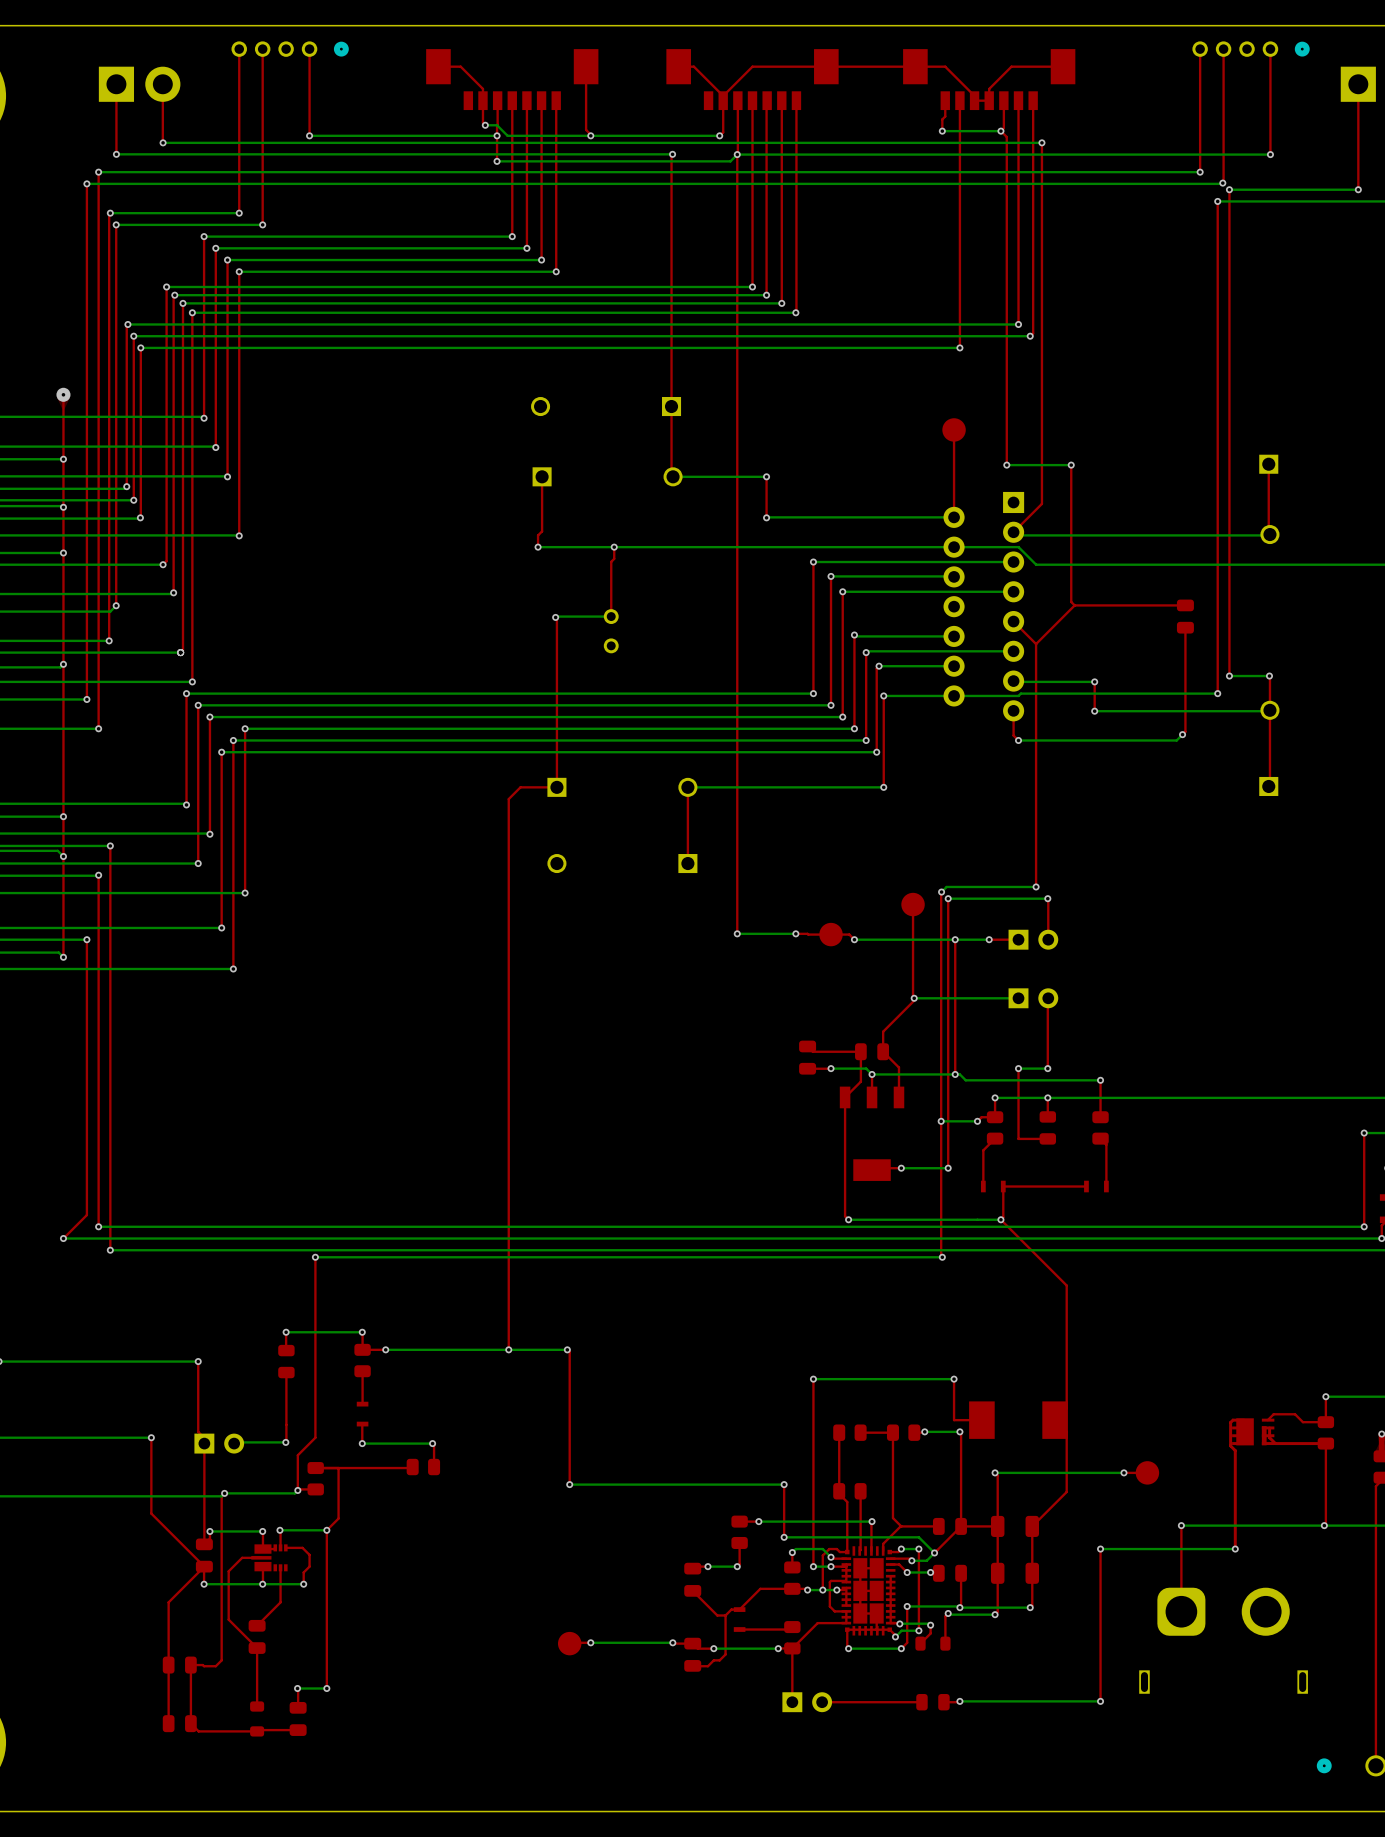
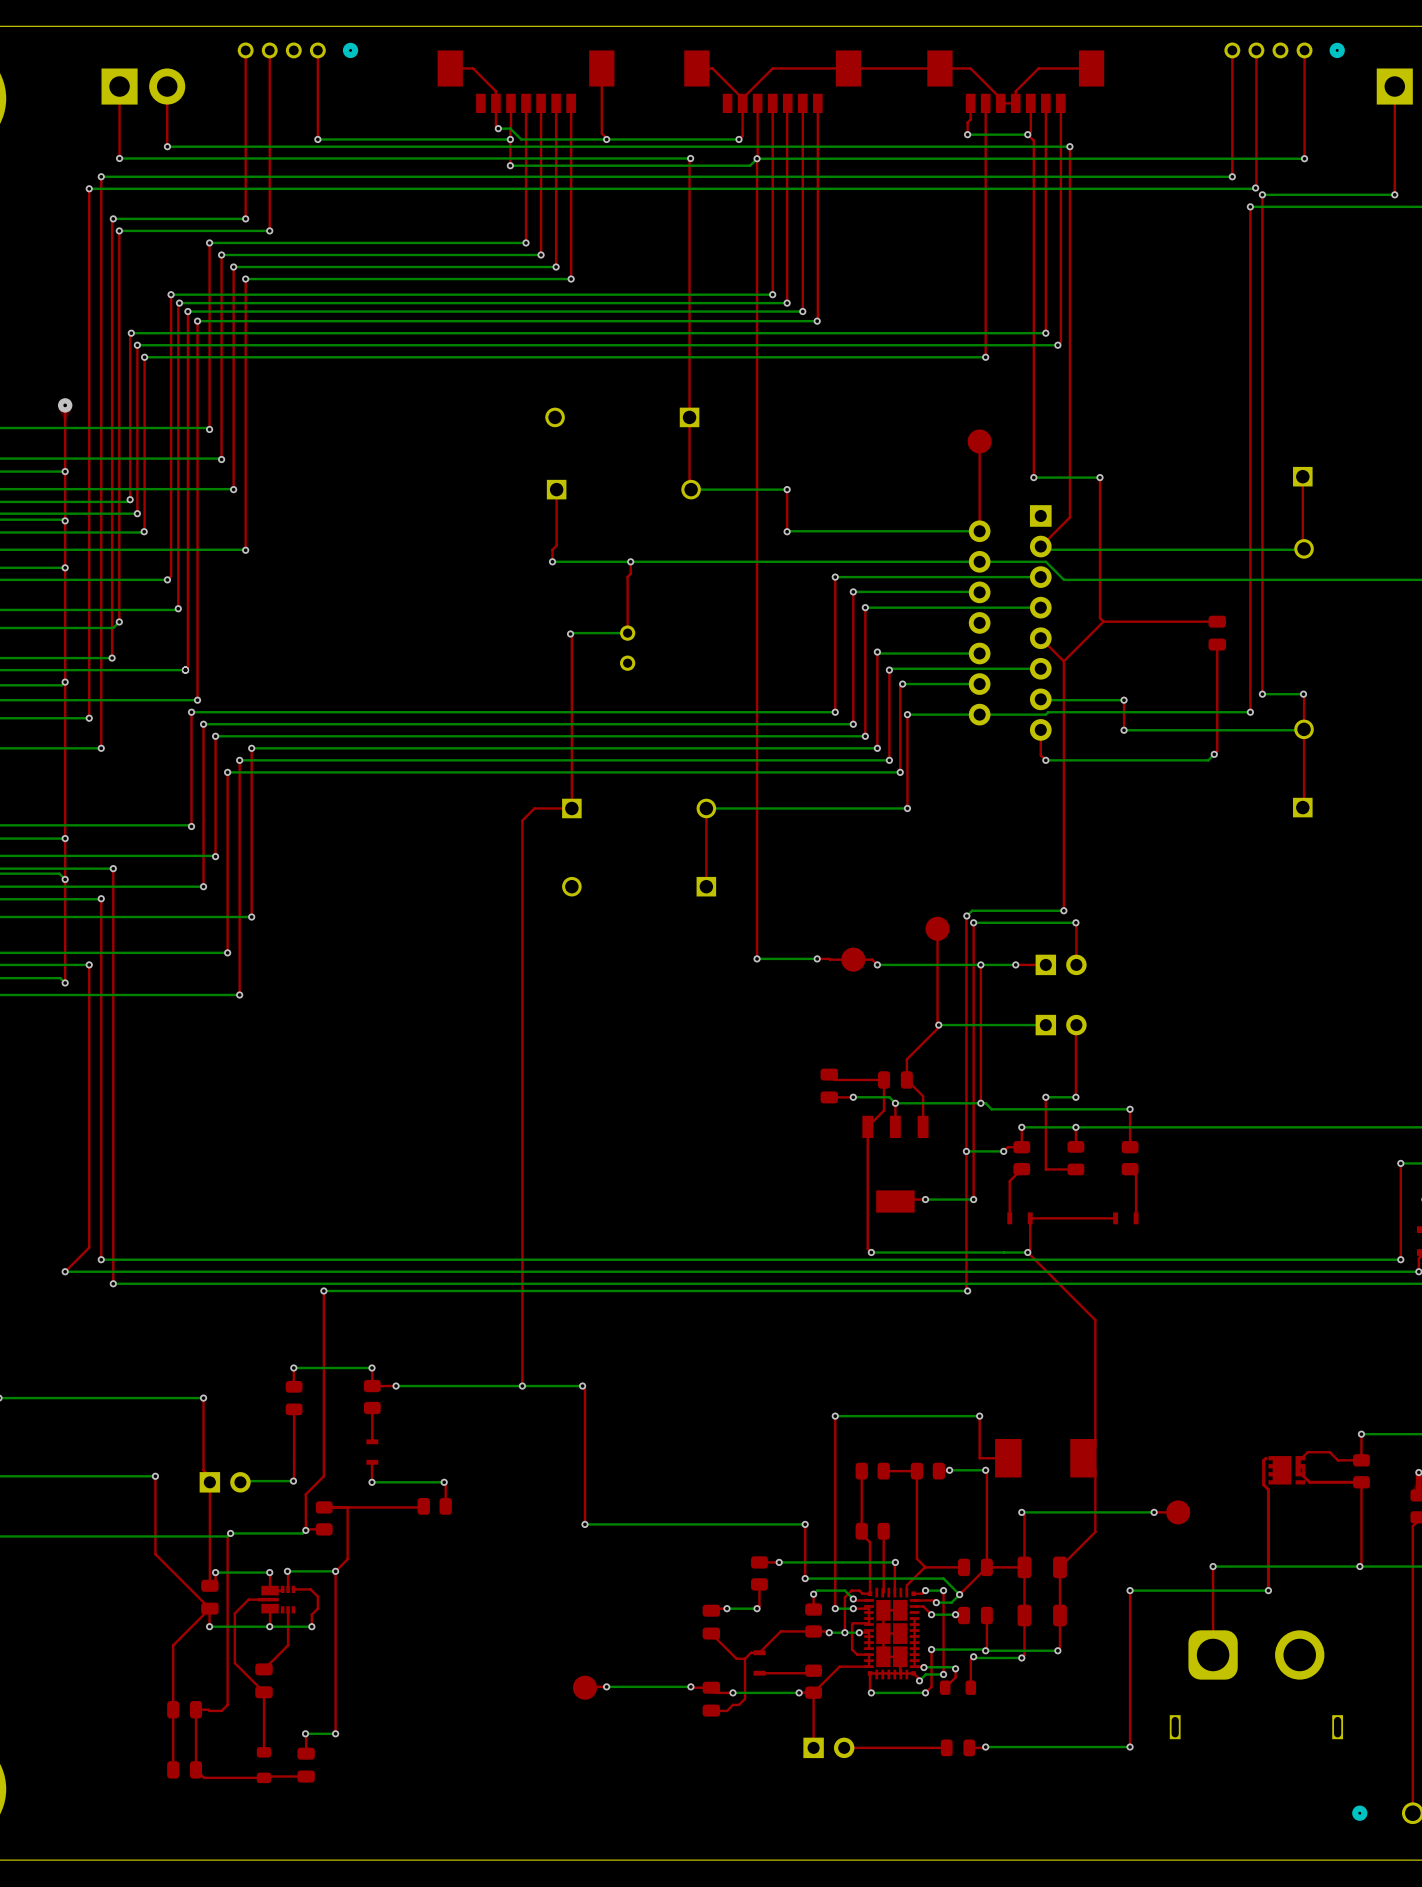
part footprint: [1232, 1418, 1275, 1446] -> [1268, 1456, 1306, 1485]

